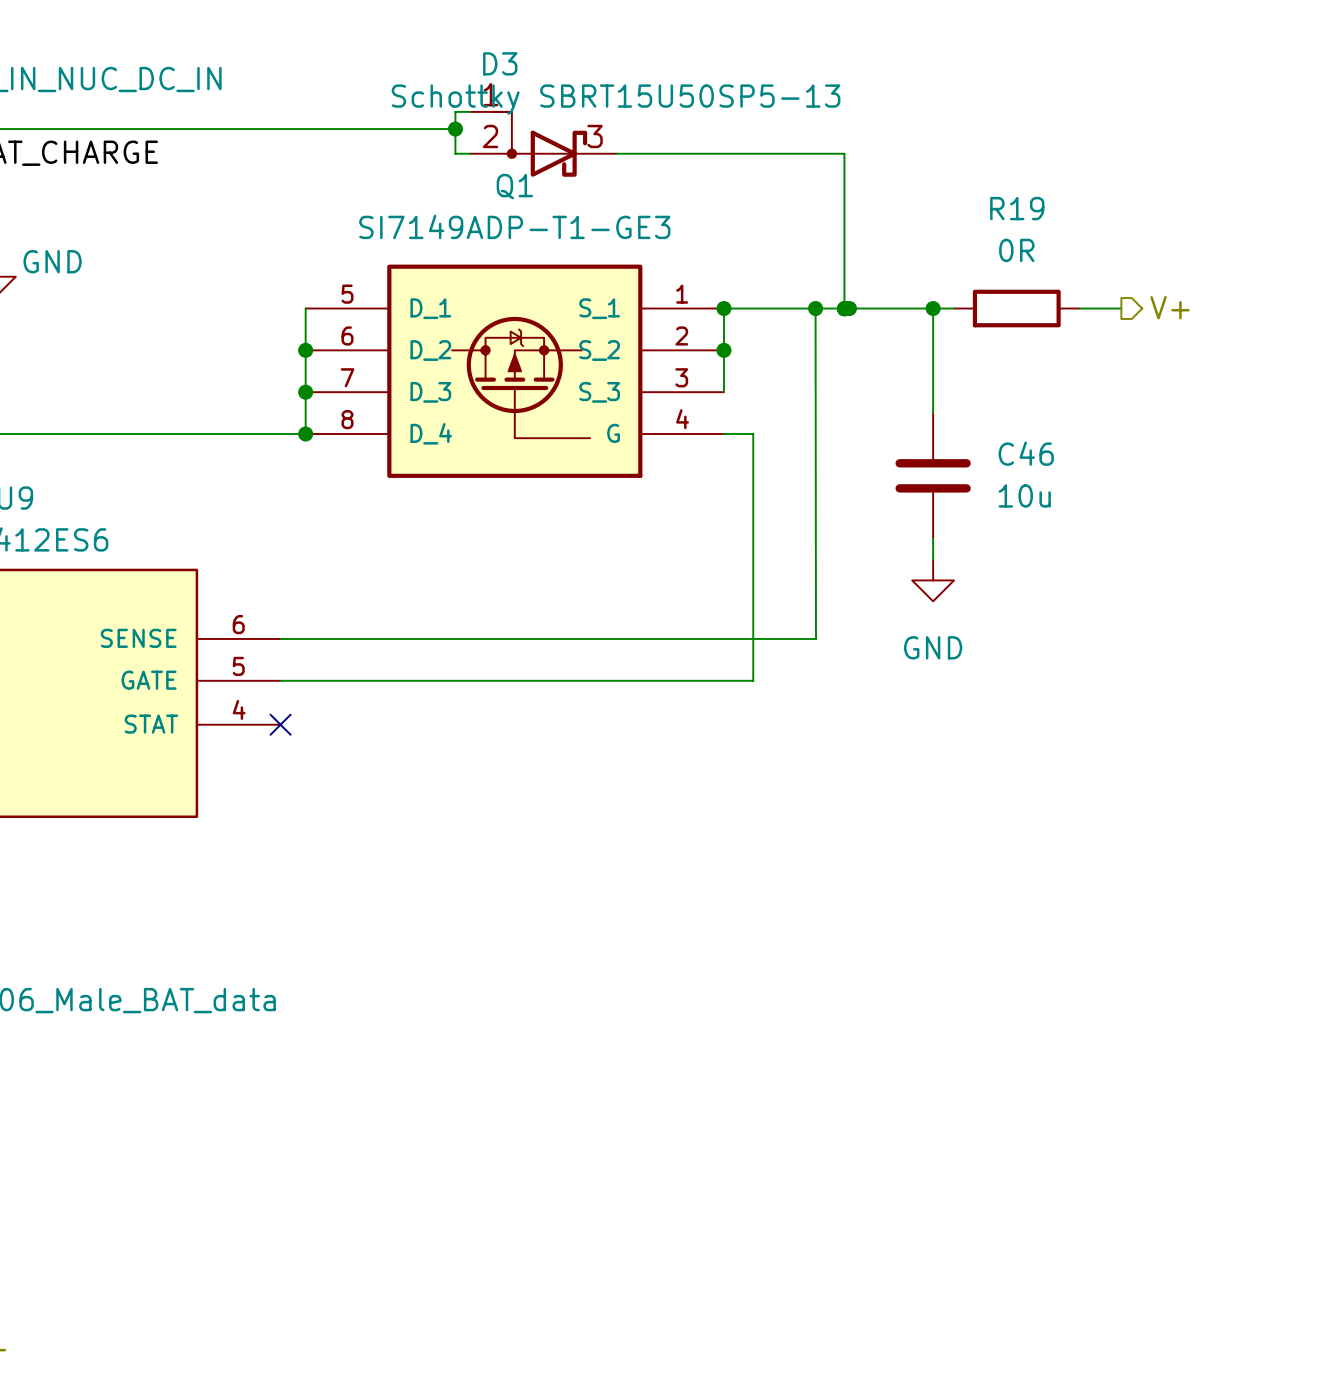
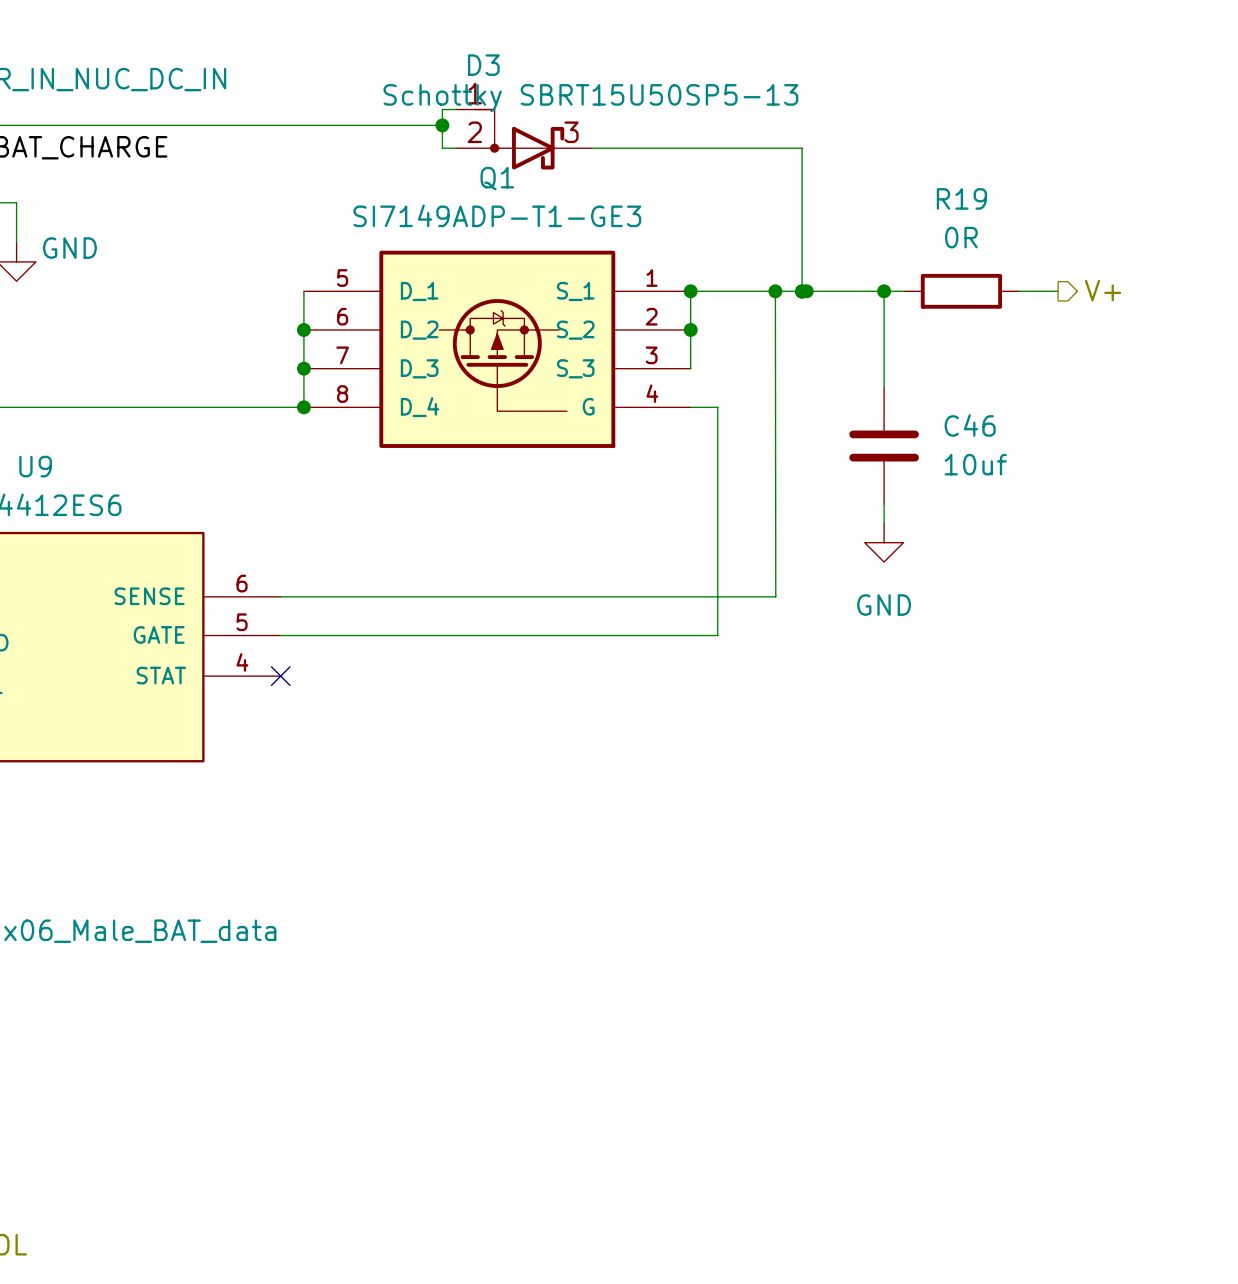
C46 value: 10u (1024, 495) -> 10uf (975, 464)

